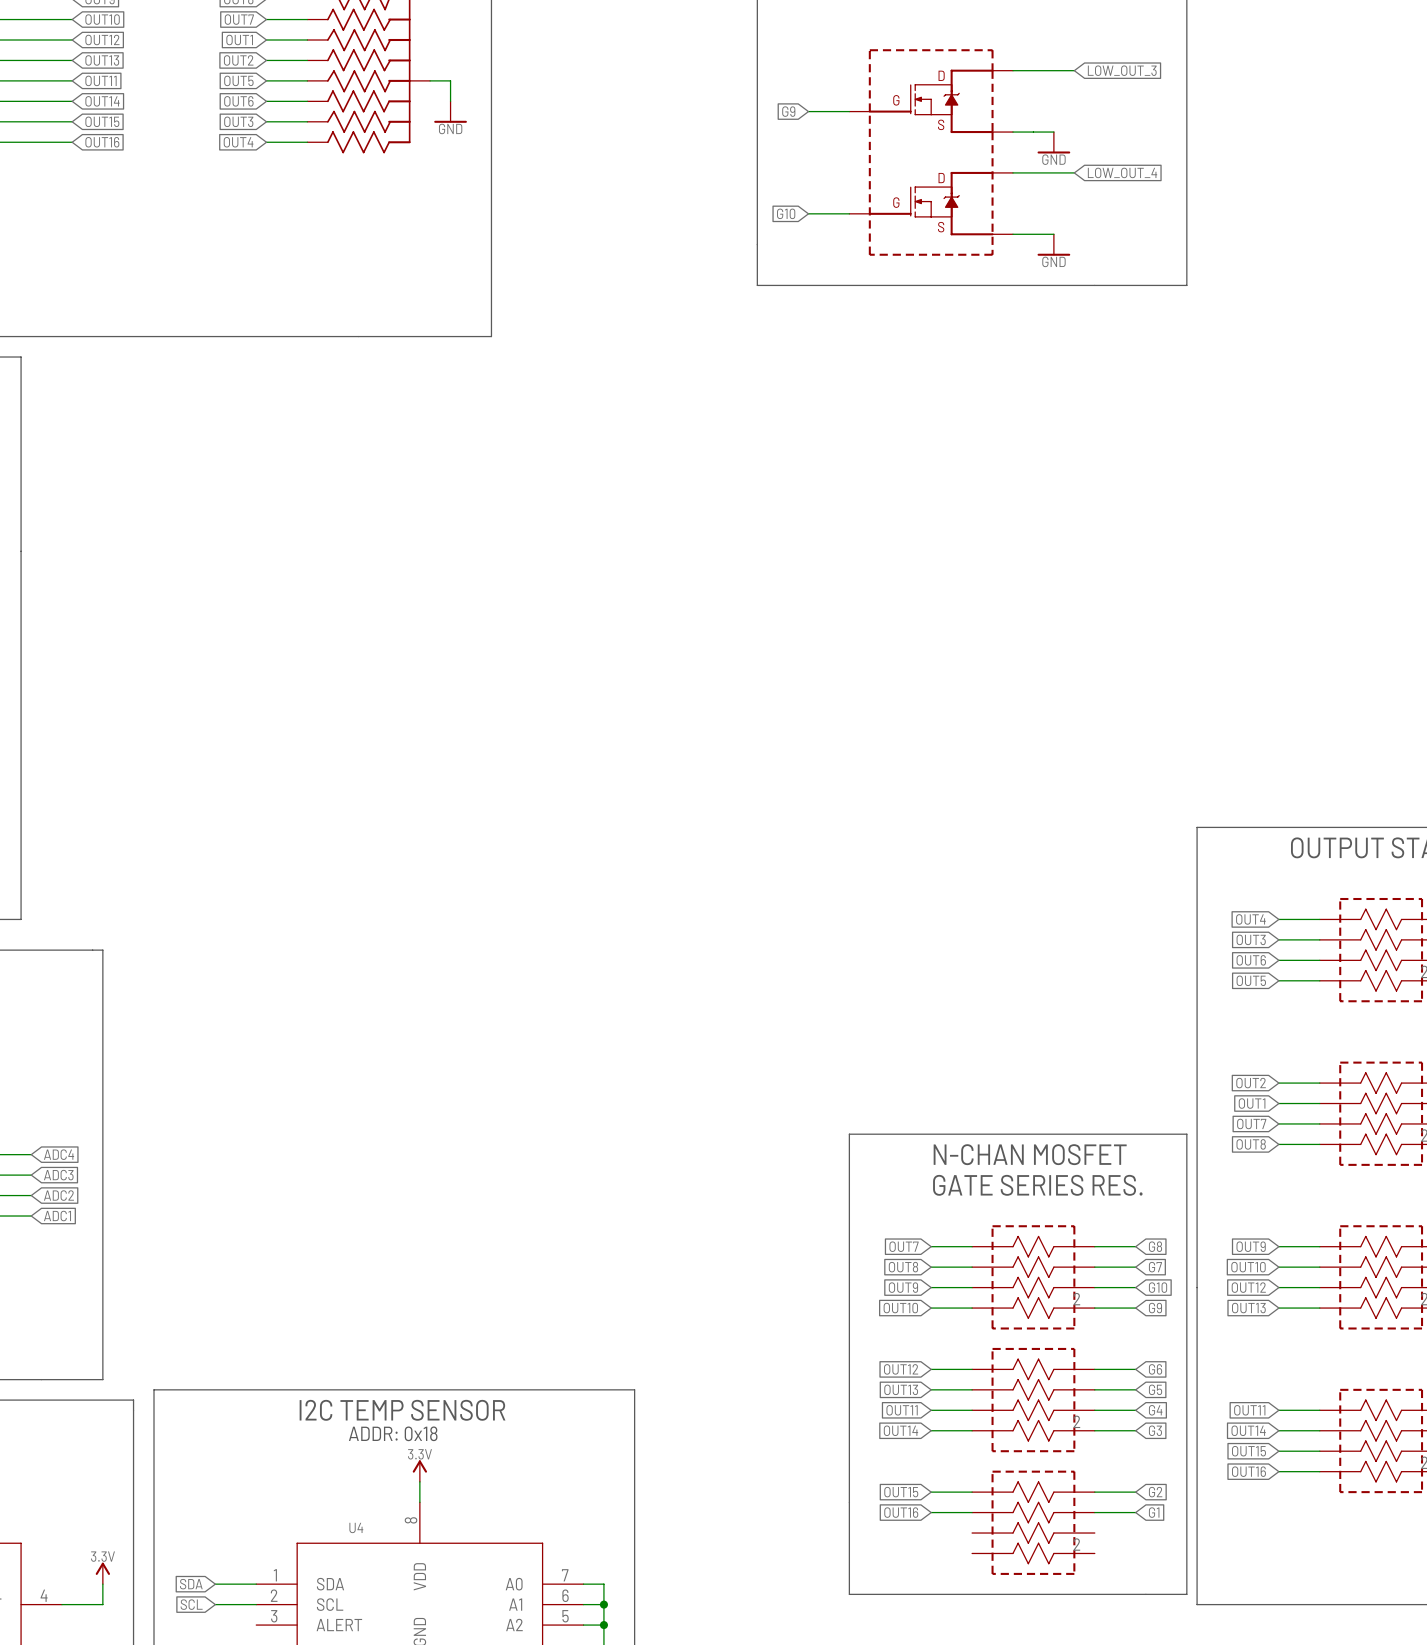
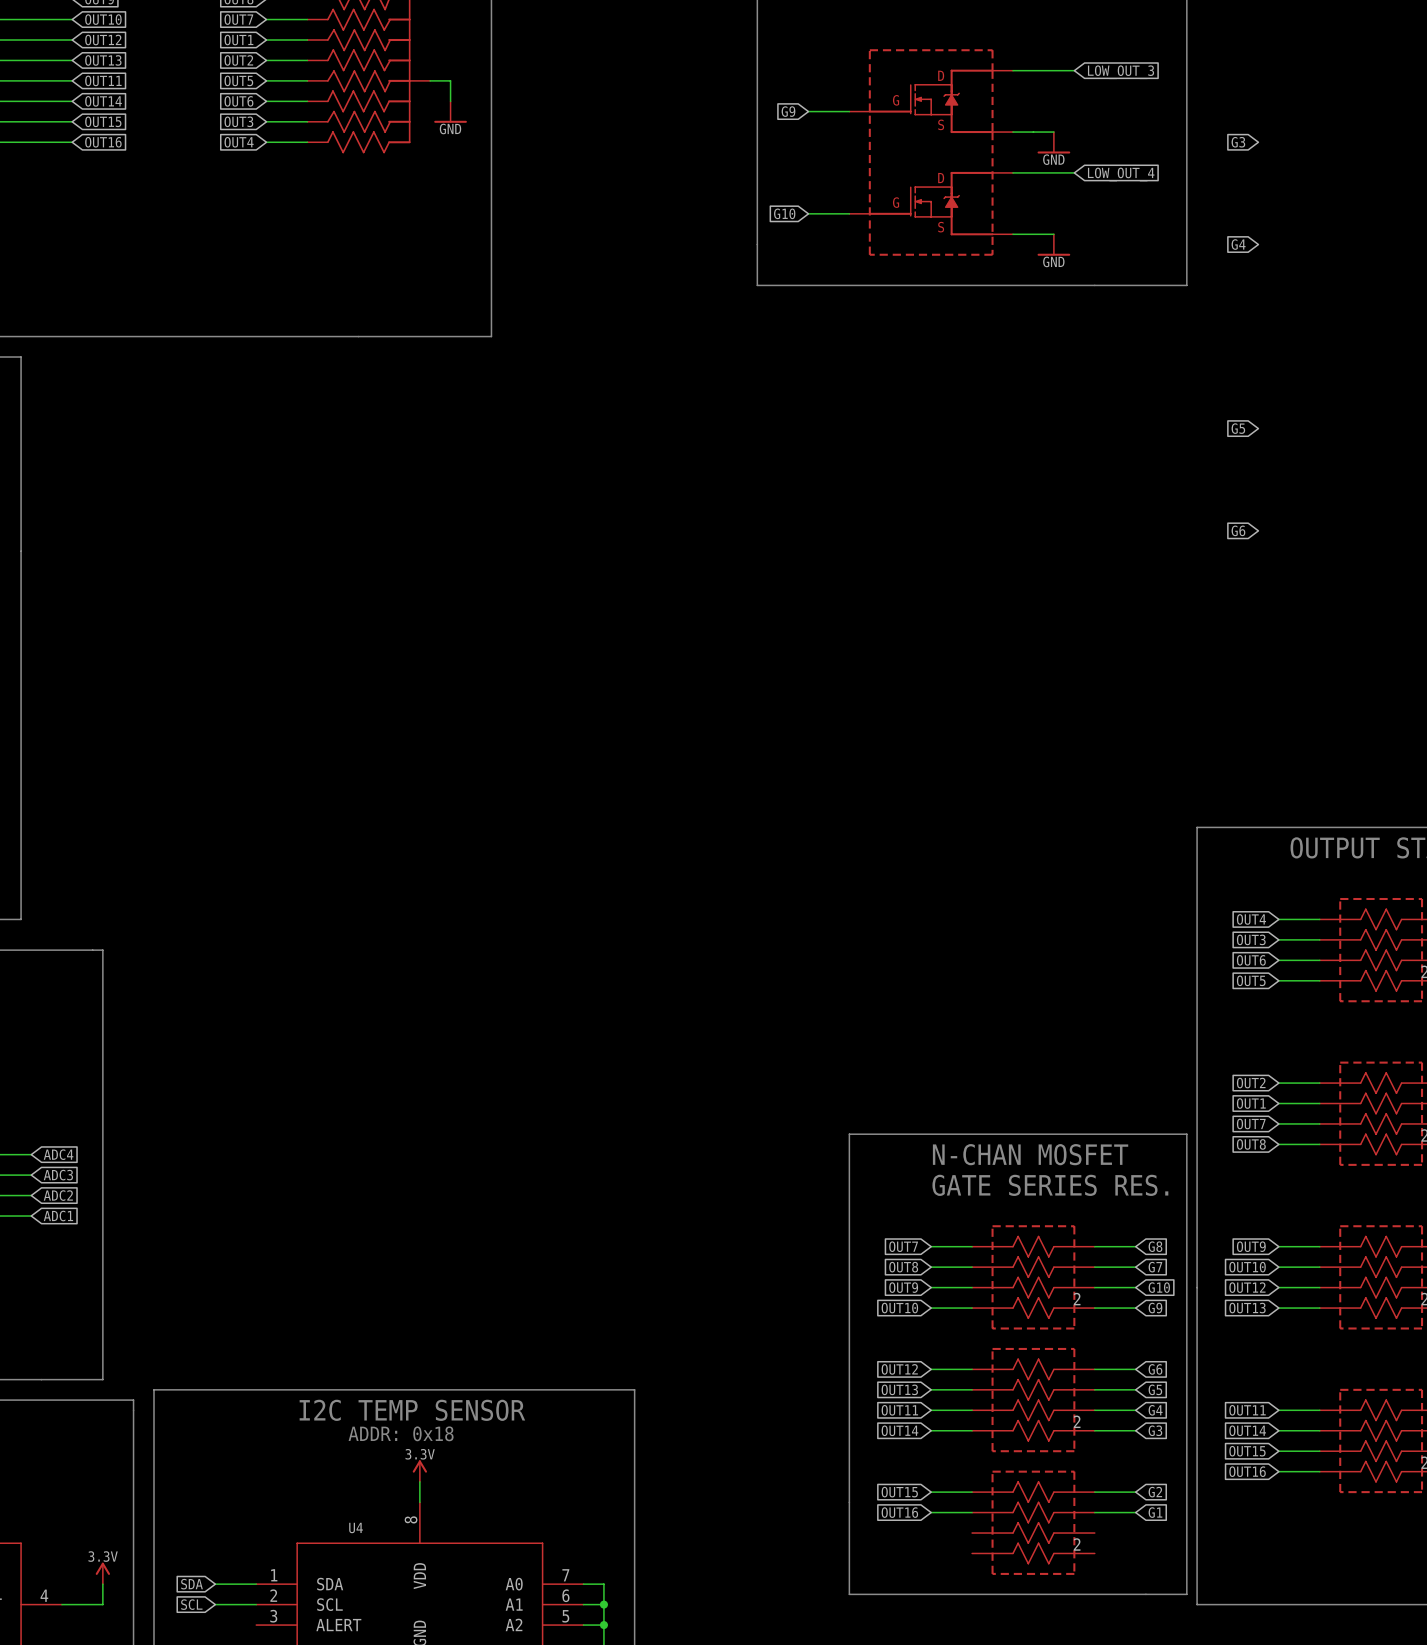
global label: none -> G3 (1238, 142)
global label: none -> G4 (1238, 244)
global label: none -> G5 (1238, 428)
global label: none -> G6 (1238, 530)

